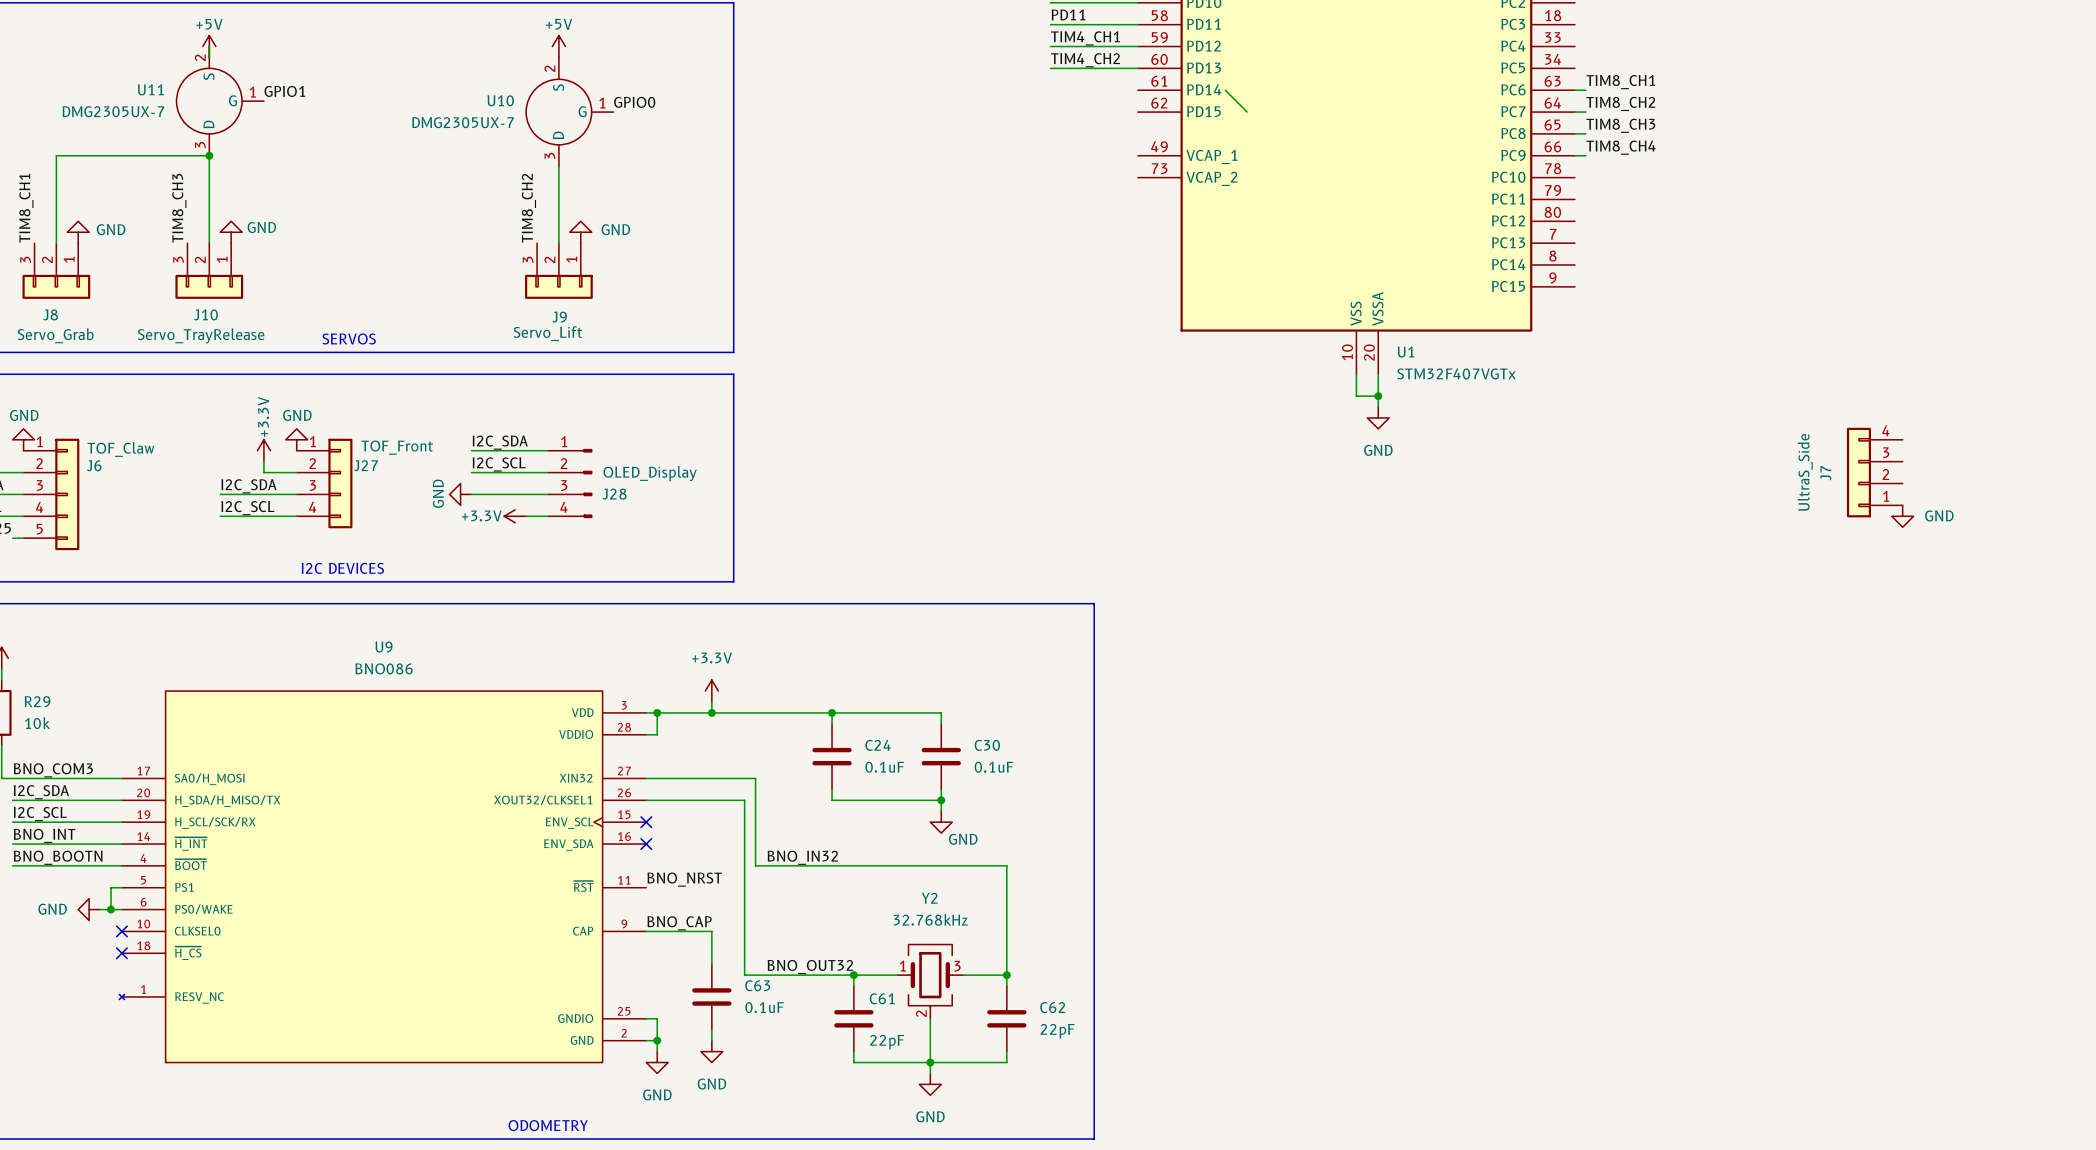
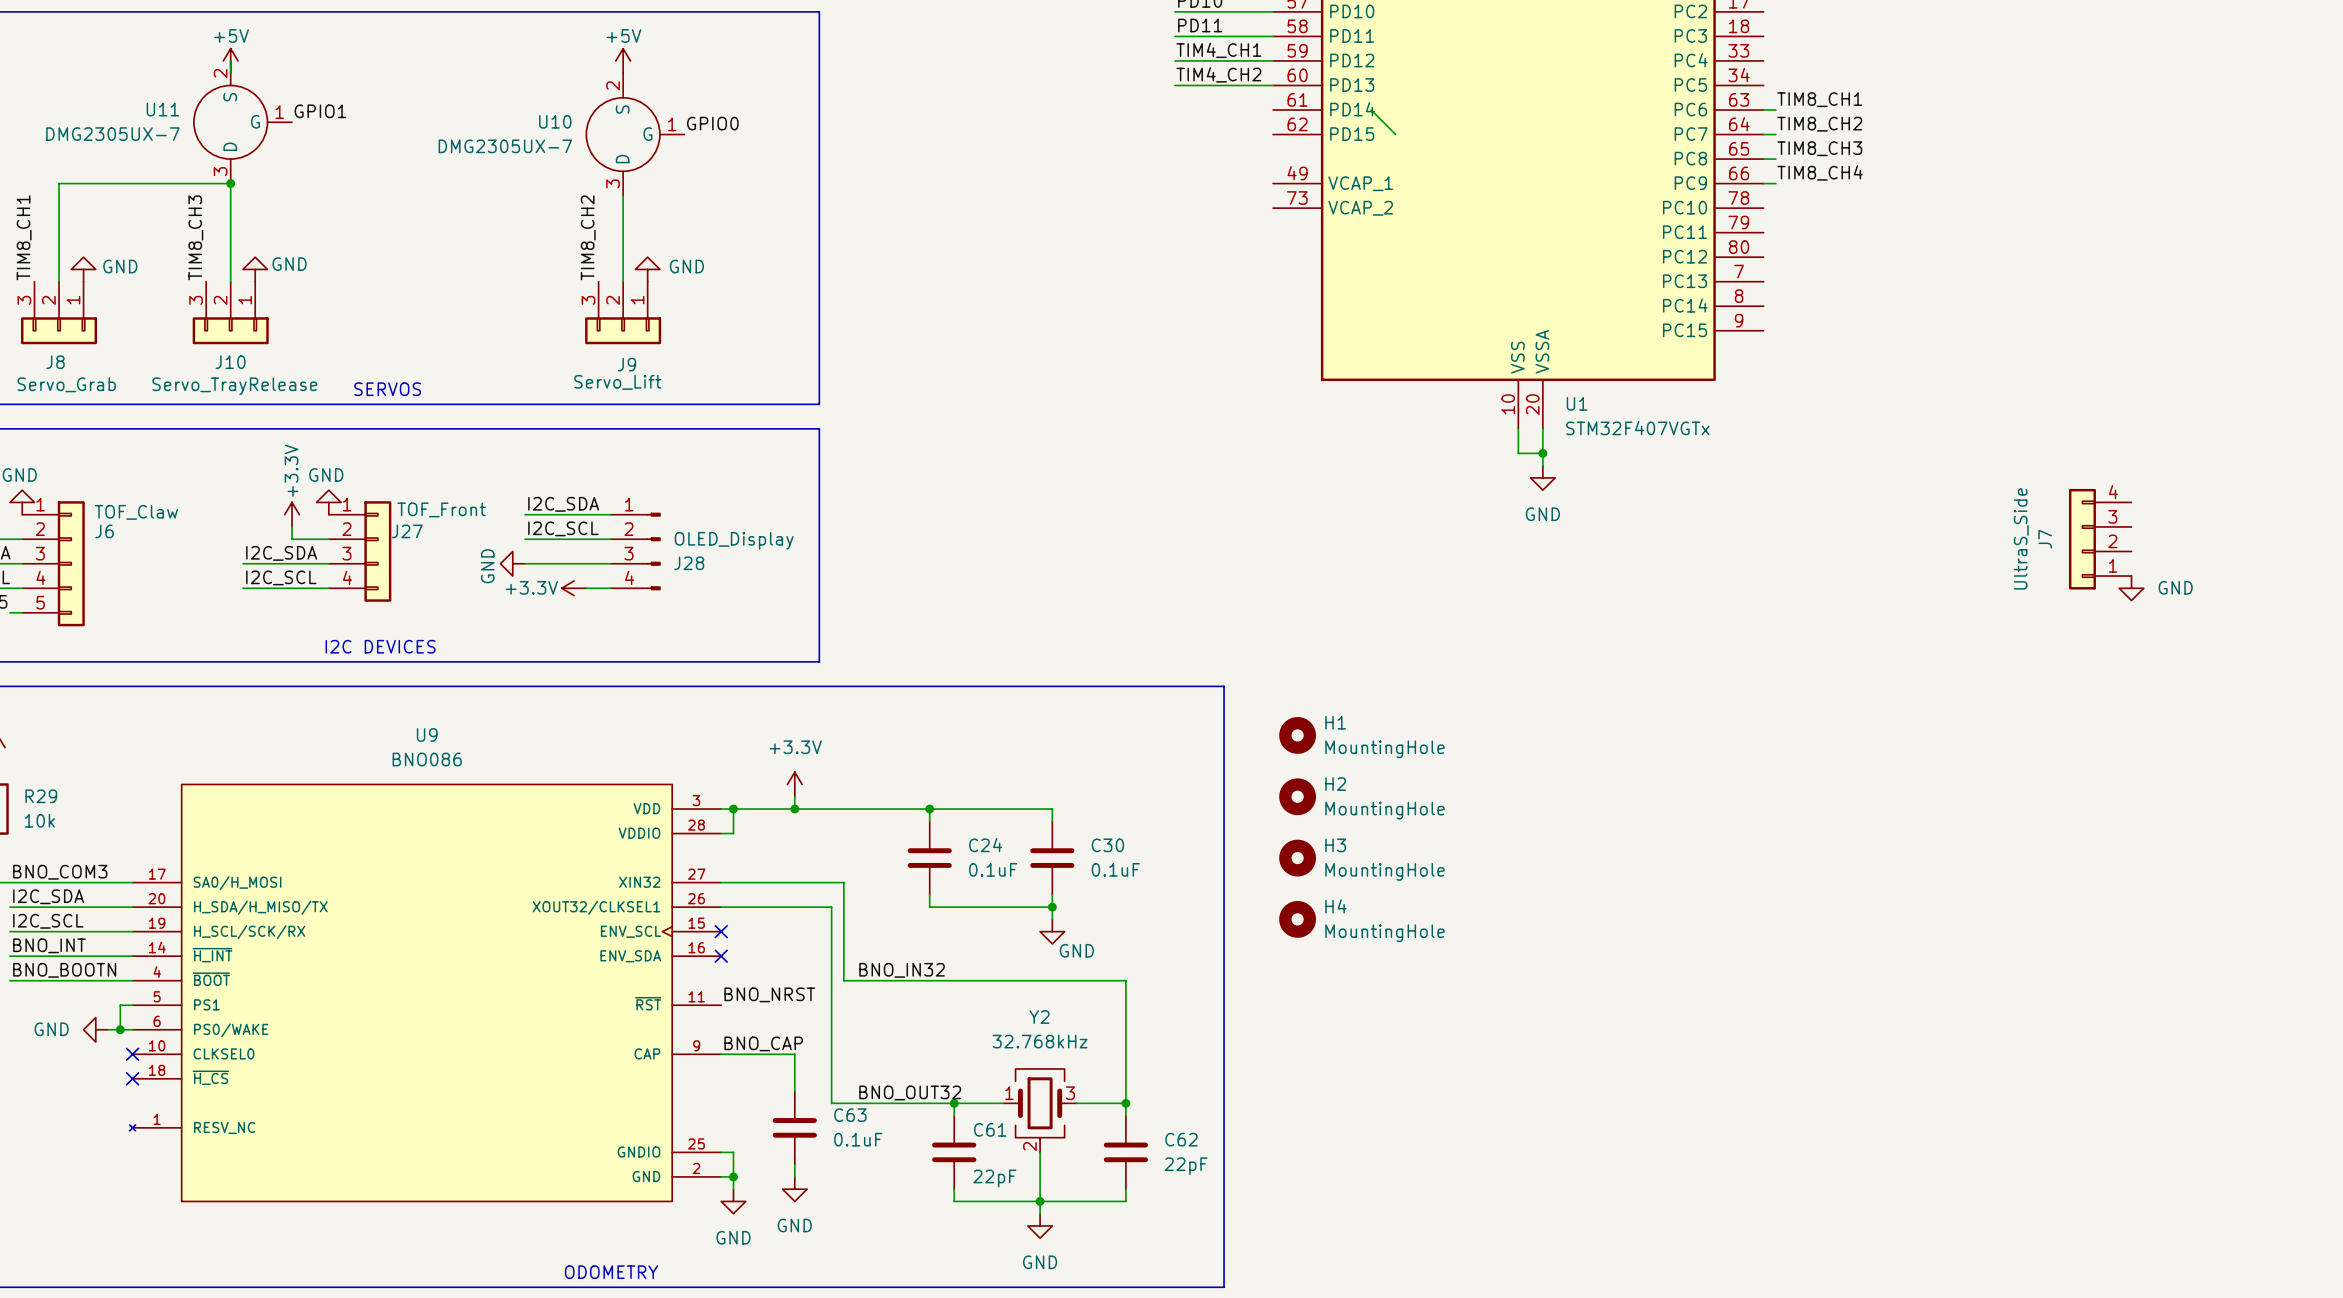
H1: none -> MountingHole (1297, 735)
H2: none -> MountingHole (1297, 796)
H3: none -> MountingHole (1297, 858)
H4: none -> MountingHole (1297, 919)

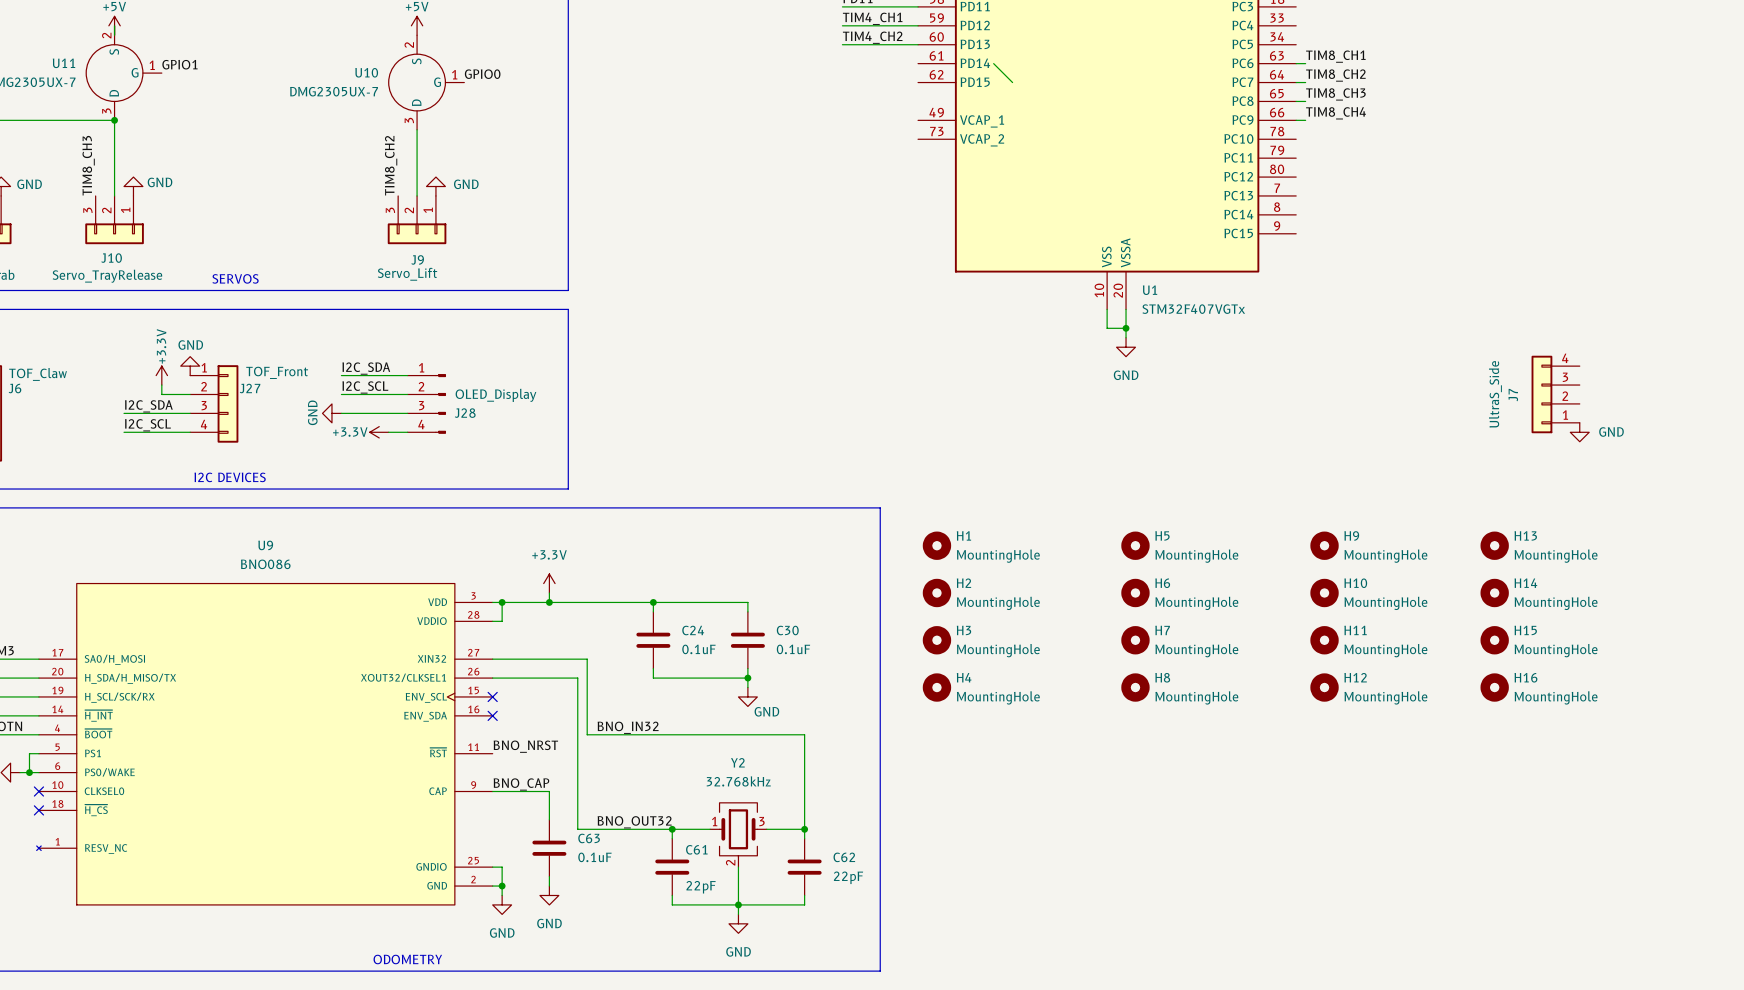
H5: none -> MountingHole (1135, 545)
H9: none -> MountingHole (1324, 545)
H13: none -> MountingHole (1494, 545)
H6: none -> MountingHole (1135, 592)
H10: none -> MountingHole (1324, 592)
H14: none -> MountingHole (1494, 592)
H7: none -> MountingHole (1135, 640)
H11: none -> MountingHole (1324, 640)
H15: none -> MountingHole (1494, 640)
H8: none -> MountingHole (1135, 687)
H12: none -> MountingHole (1324, 687)
H16: none -> MountingHole (1494, 687)

